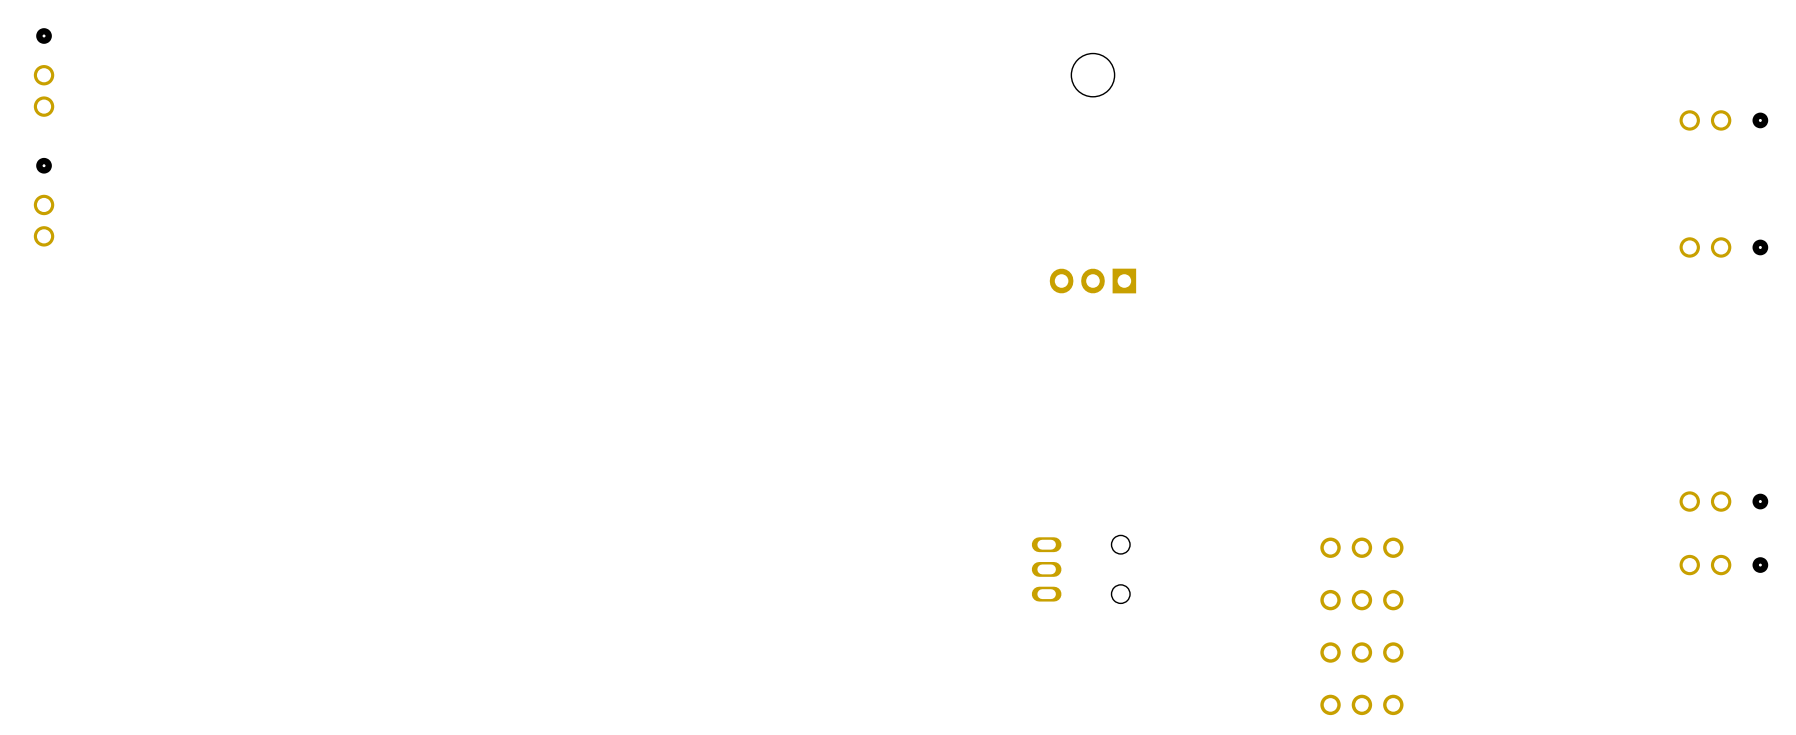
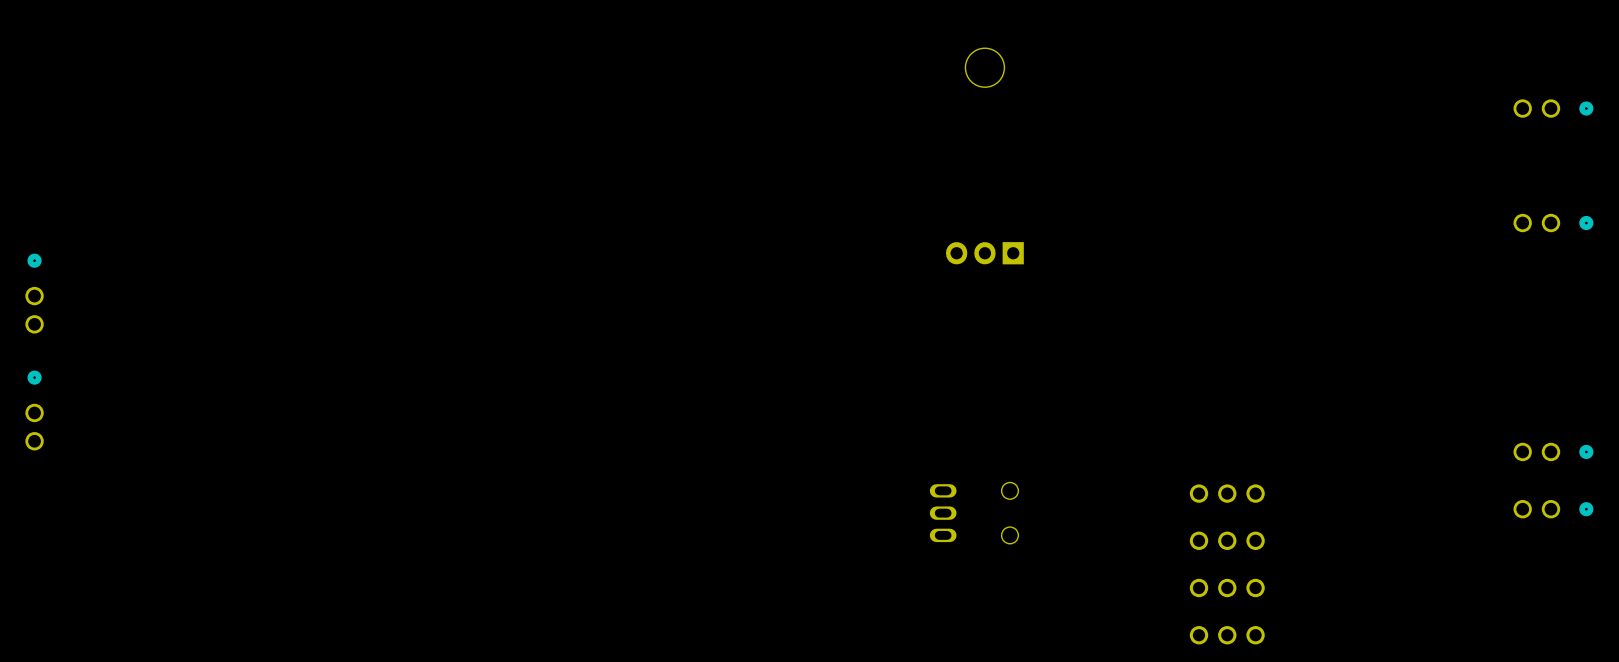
part: (44, 72) -> none
part position: (44, 202) -> (34, 293)
part: none -> (34, 410)

